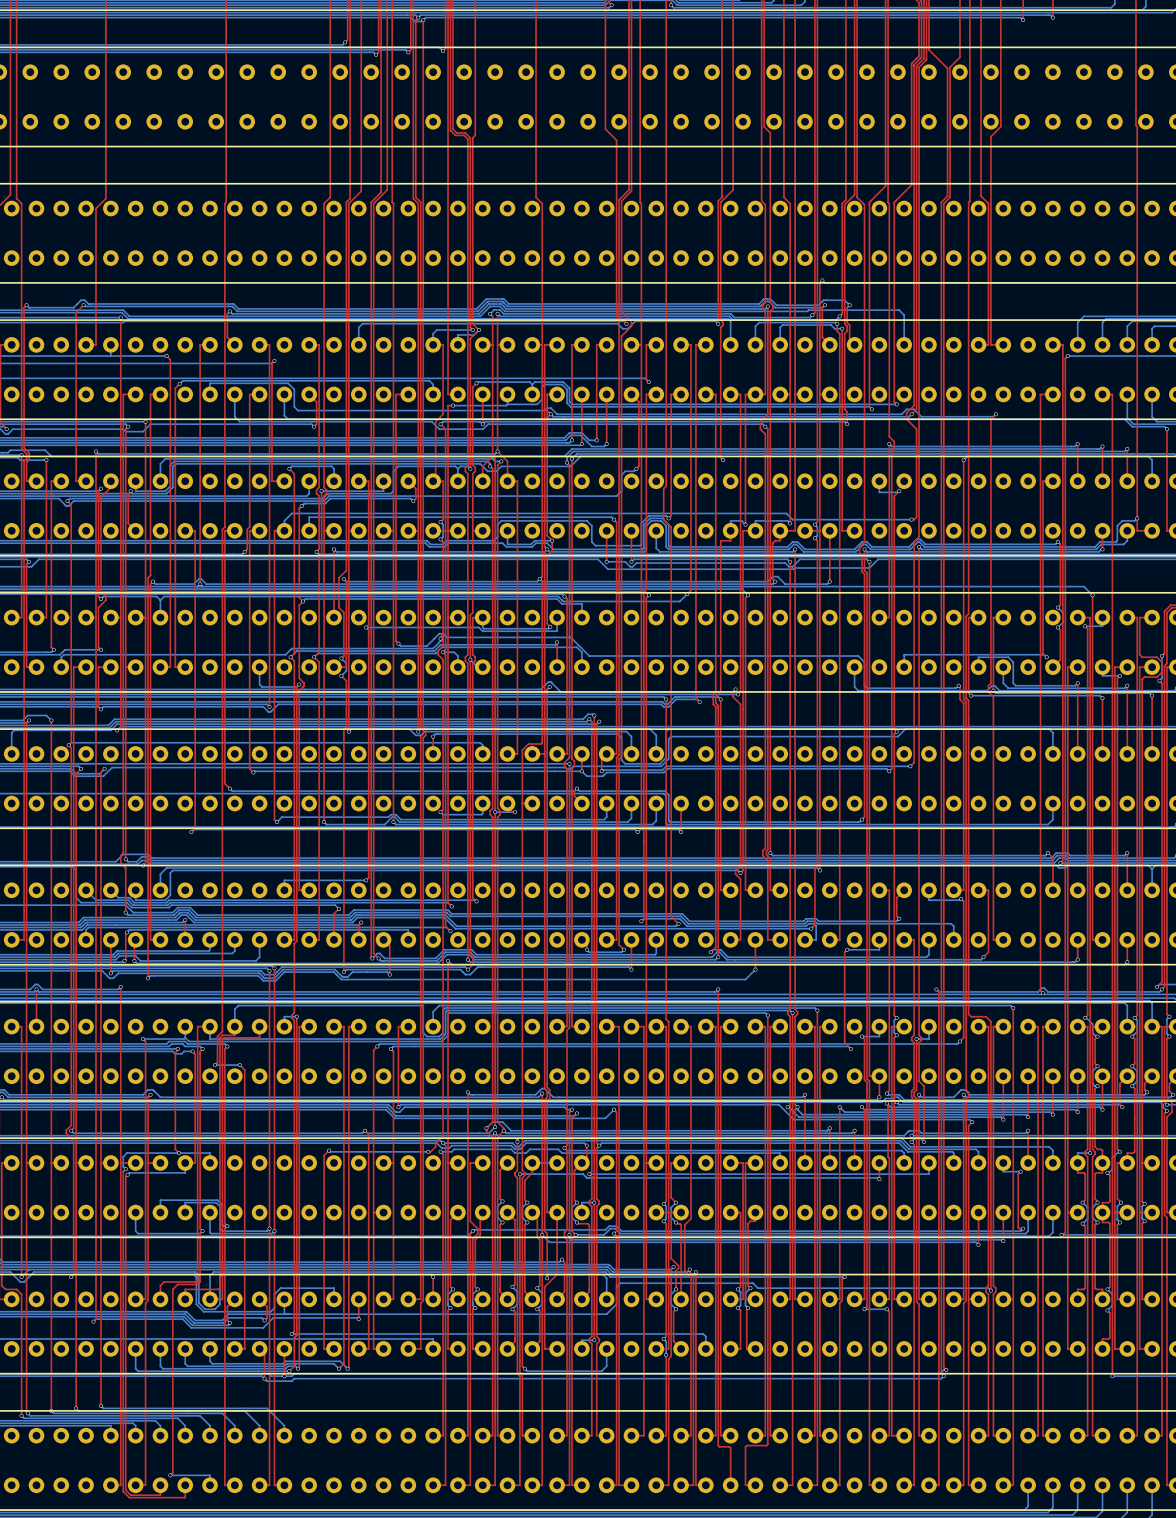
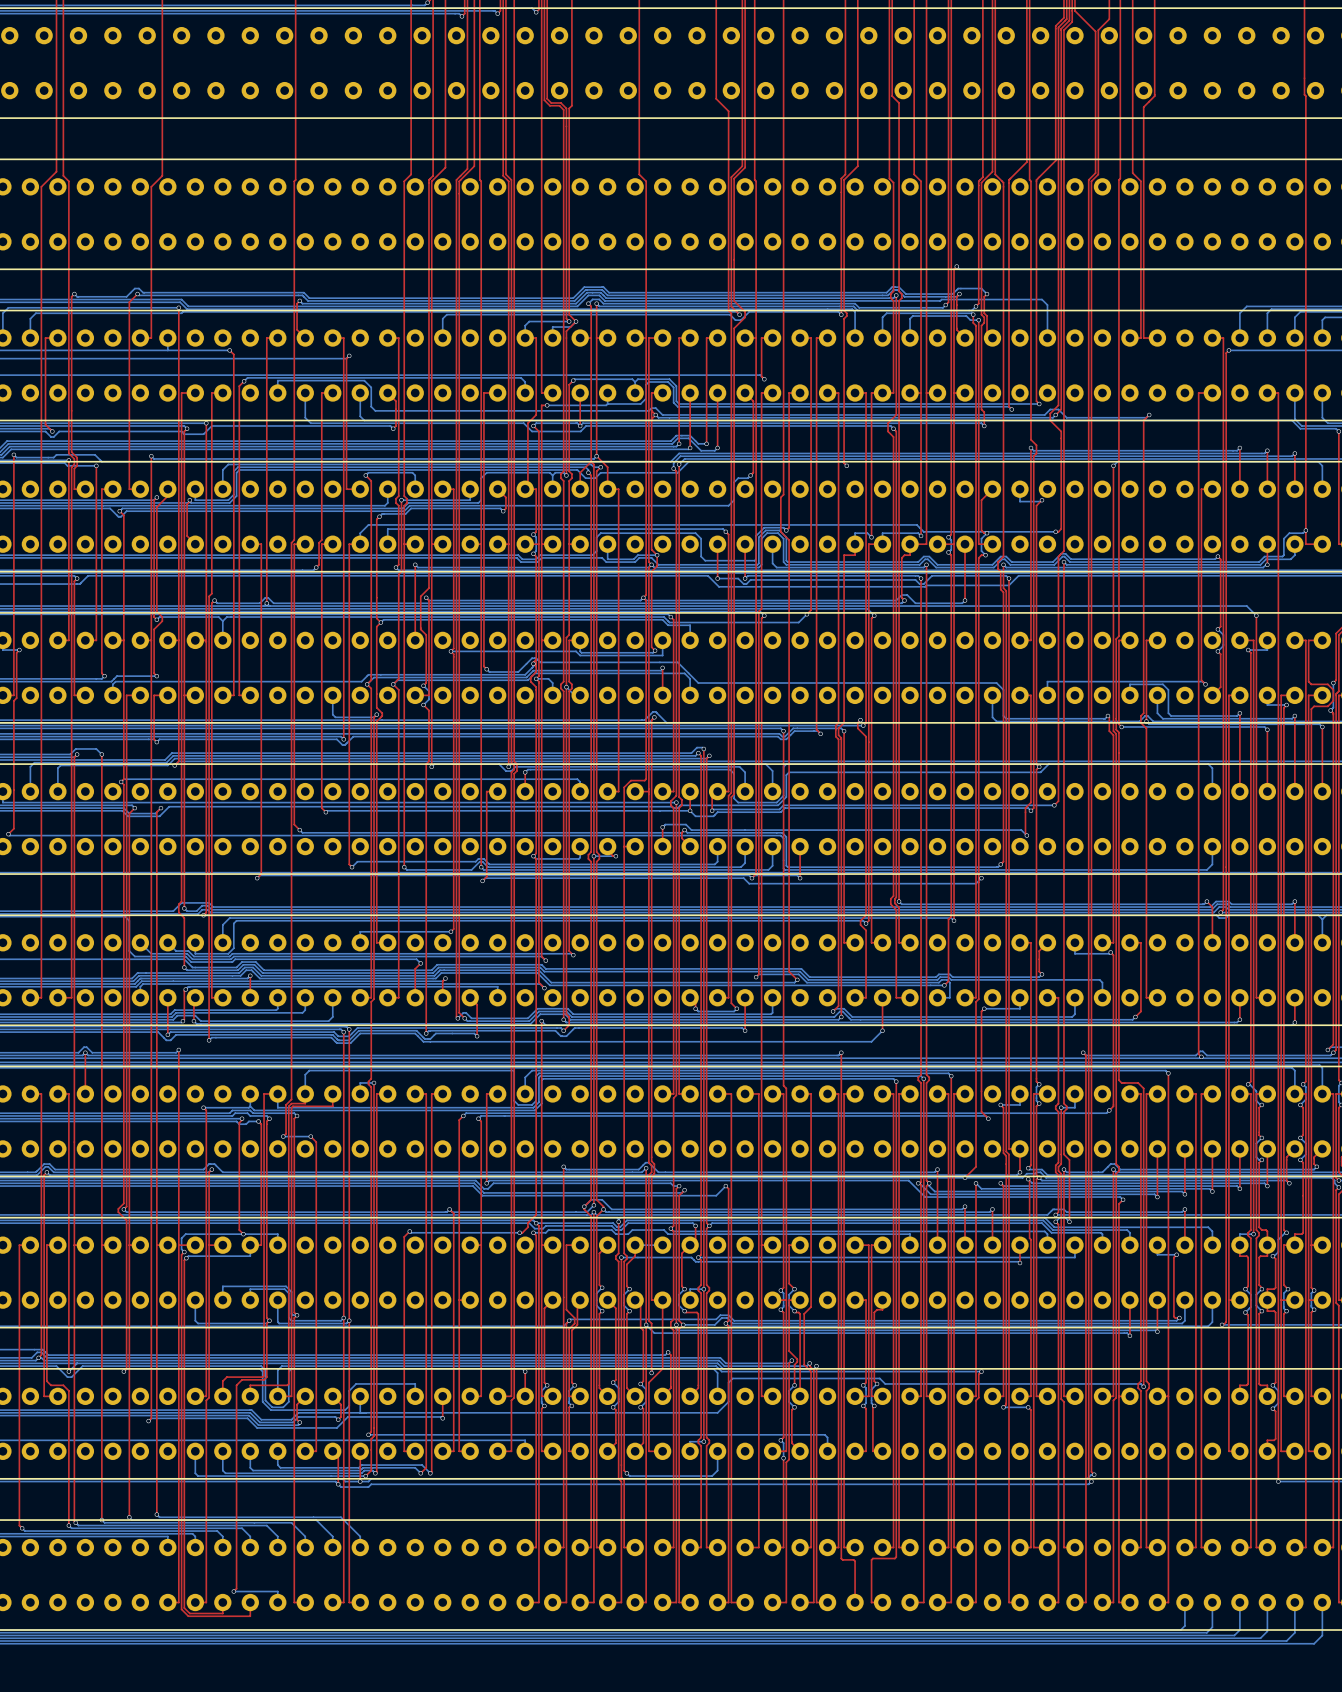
top track: none -> (992, 489) (981, 500) (981, 530) (987, 533)
bottom track: none -> (987, 533) (981, 538) (981, 551) (985, 555)
via: none -> (987, 533)
top track: none -> (985, 555) (981, 555) (978, 557) (978, 999) (976, 1001) (976, 1166) (965, 1177)
via: none -> (985, 555)
top track: none -> (1019, 695) (1030, 695) (1030, 802) (1025, 808) (1026, 835)
top track: none -> (497, 791) (486, 791) (486, 876) (482, 880)
top track: none -> (662, 827) (662, 846)
bottom track: none -> (662, 827) (665, 824) (686, 824) (691, 830) (1021, 830) (1026, 835)
via: none -> (662, 827)
via: none -> (1026, 835)
bottom track: none -> (981, 878) (976, 883) (749, 883) (743, 878) (485, 878) (482, 880)
via: none -> (981, 878)
via: none -> (482, 880)
via: none -> (965, 1177)

